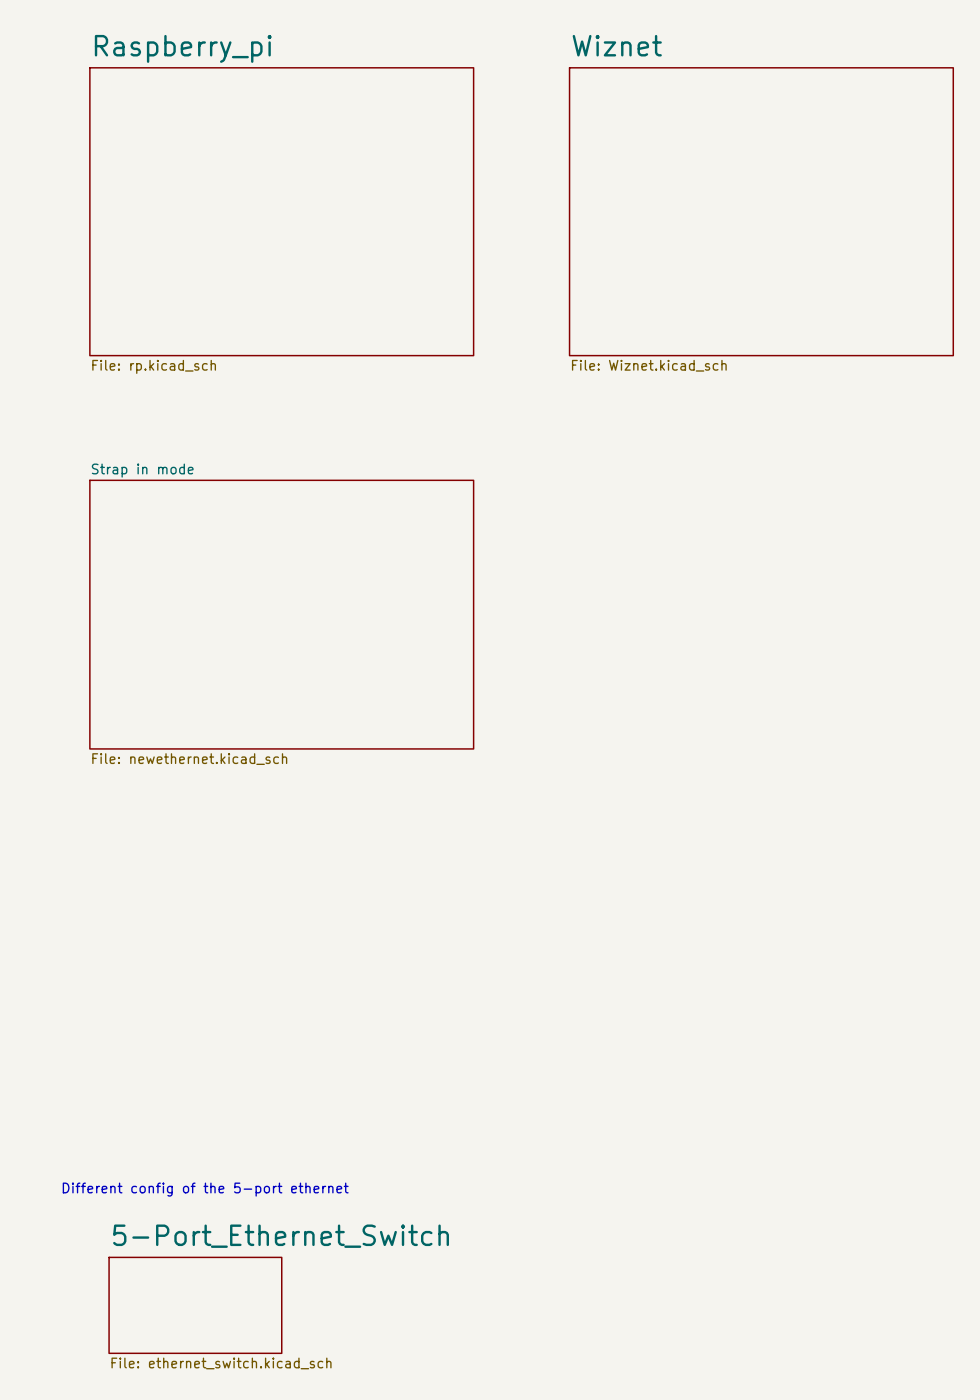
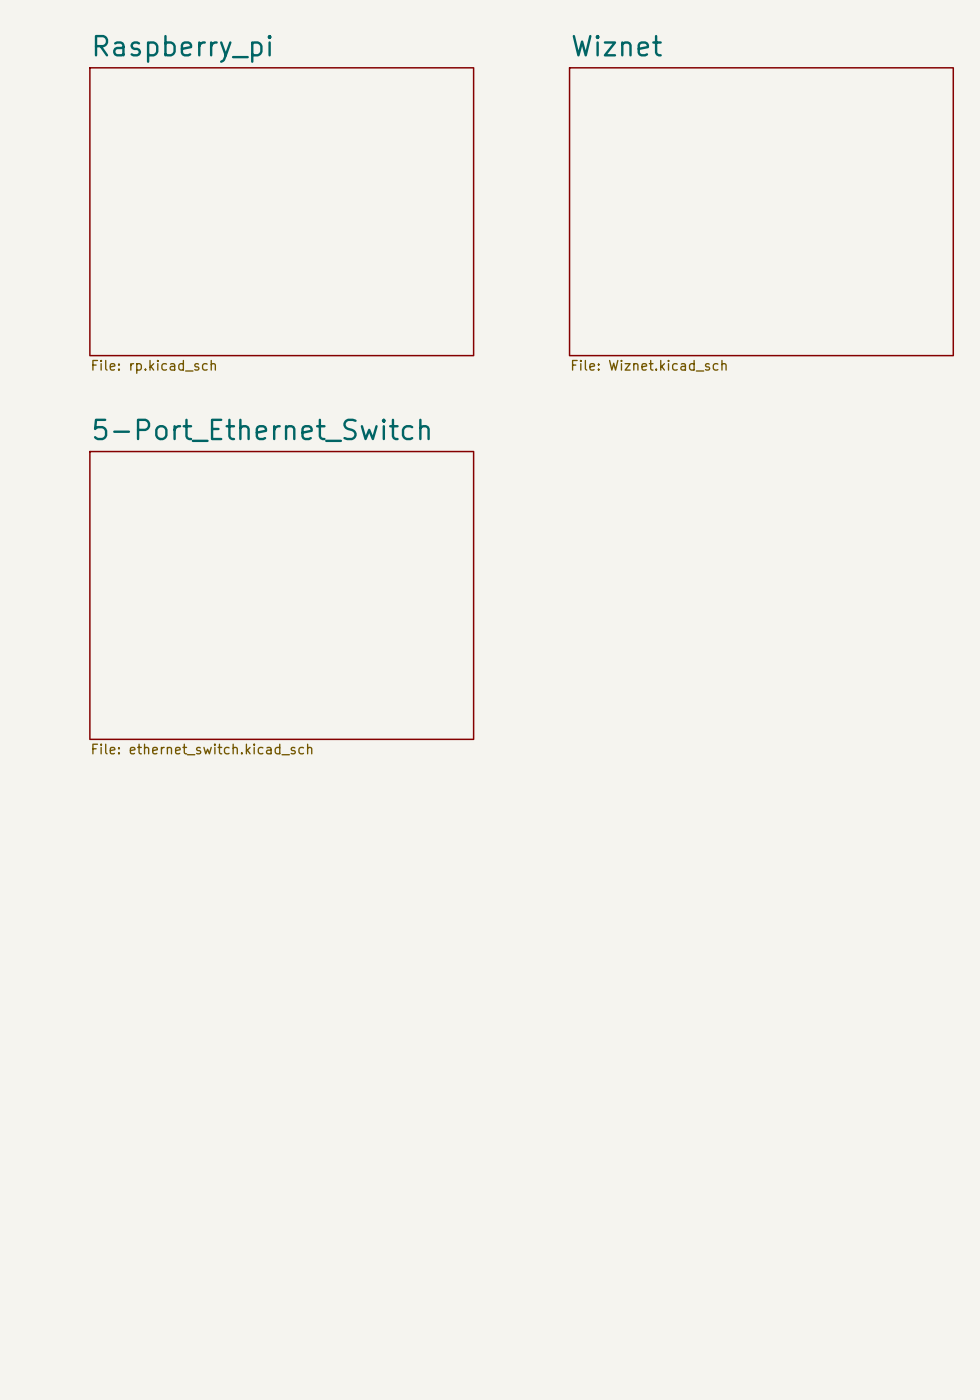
sheet Strap in mode: File: newethernet.kicad_sch (281, 614) -> none
text: Different config of the 5-port ethernet (205, 1189) -> none
sheet 5-Port_Ethernet_Switch name position: 5-Port_Ethernet_Switch (281, 1236) -> 5-Port_Ethernet_Switch (261, 430)
sheet 5-Port_Ethernet_Switch shape: [108, 1256, 283, 1354] -> [89, 450, 475, 740]
sheet 5-Port_Ethernet_Switch value position: File: ethernet_switch.kicad_sch (221, 1363) -> File: ethernet_switch.kicad_sch (202, 749)

